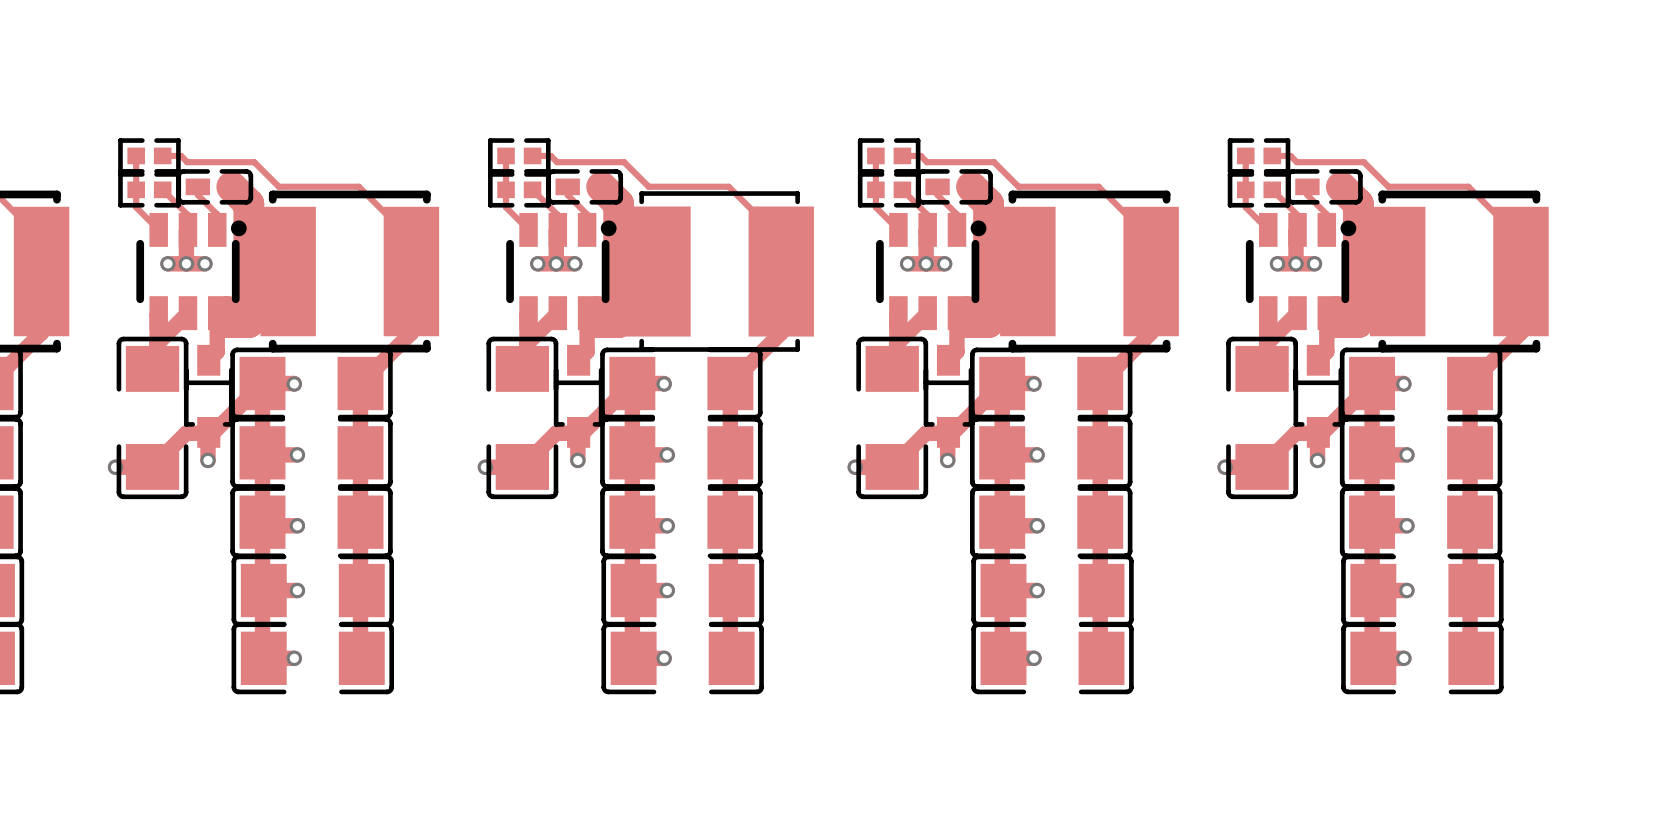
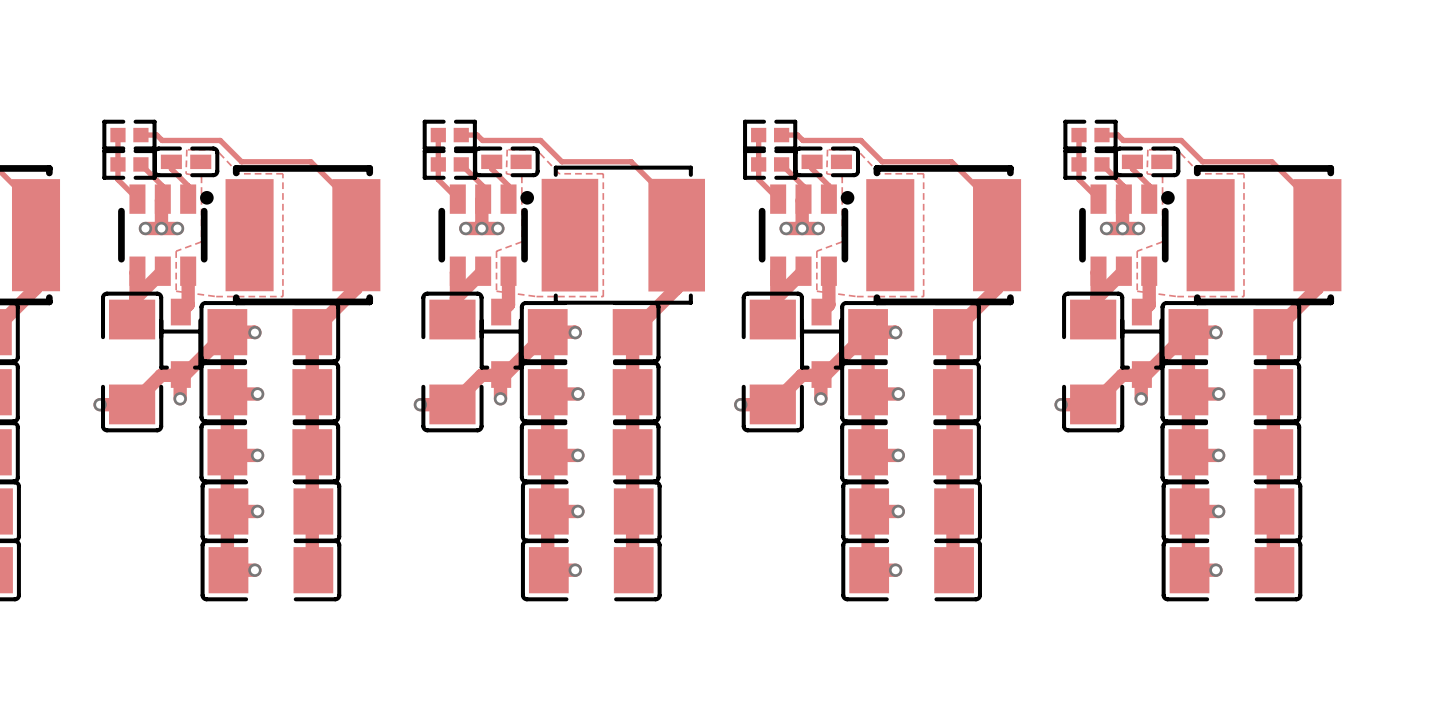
top zone outline: none -> (186, 149) (216, 149) (238, 173) (282, 173) (282, 296) (216, 296) (176, 291) (176, 251) (201, 241) (201, 176) (186, 173) (186, 149)
top zone outline: none -> (507, 149) (536, 149) (559, 173) (603, 173) (603, 296) (536, 296) (496, 291) (496, 251) (521, 241) (521, 176) (506, 173) (507, 149)
top zone outline: none -> (827, 149) (856, 149) (879, 173) (923, 173) (923, 296) (856, 296) (816, 291) (816, 251) (842, 241) (842, 176) (826, 173) (827, 149)
top zone outline: none -> (1147, 149) (1177, 149) (1199, 173) (1243, 173) (1243, 296) (1177, 296) (1137, 291) (1137, 251) (1162, 241) (1162, 176) (1147, 173) (1147, 149)
top track: (231, 186) (248, 203) (248, 322) (228, 322) (227, 311) -> none
top track: (601, 186) (618, 203) (618, 322) (598, 322) (597, 311) -> none
top track: (971, 186) (988, 203) (988, 322) (967, 322) (967, 311) -> none
top track: (1341, 186) (1358, 203) (1358, 322) (1337, 322) (1337, 311) -> none

